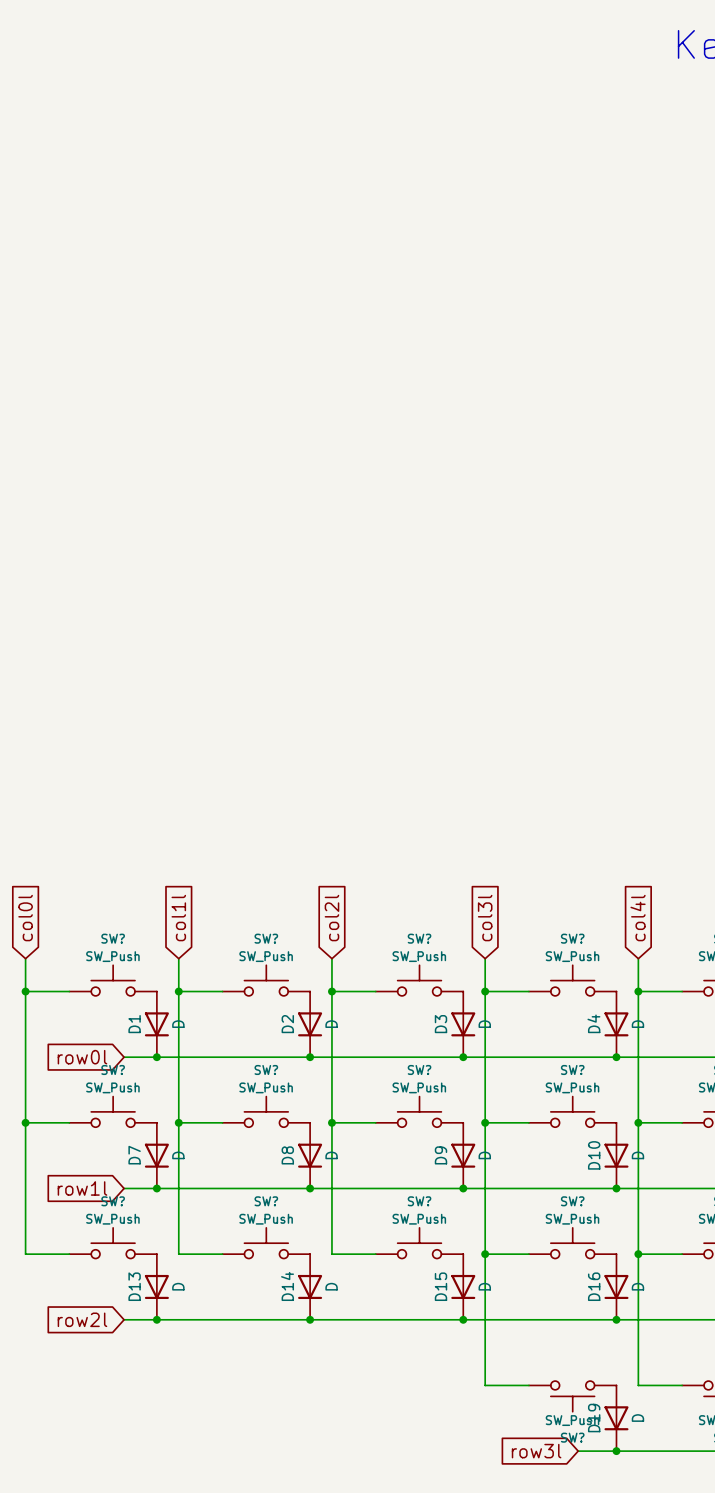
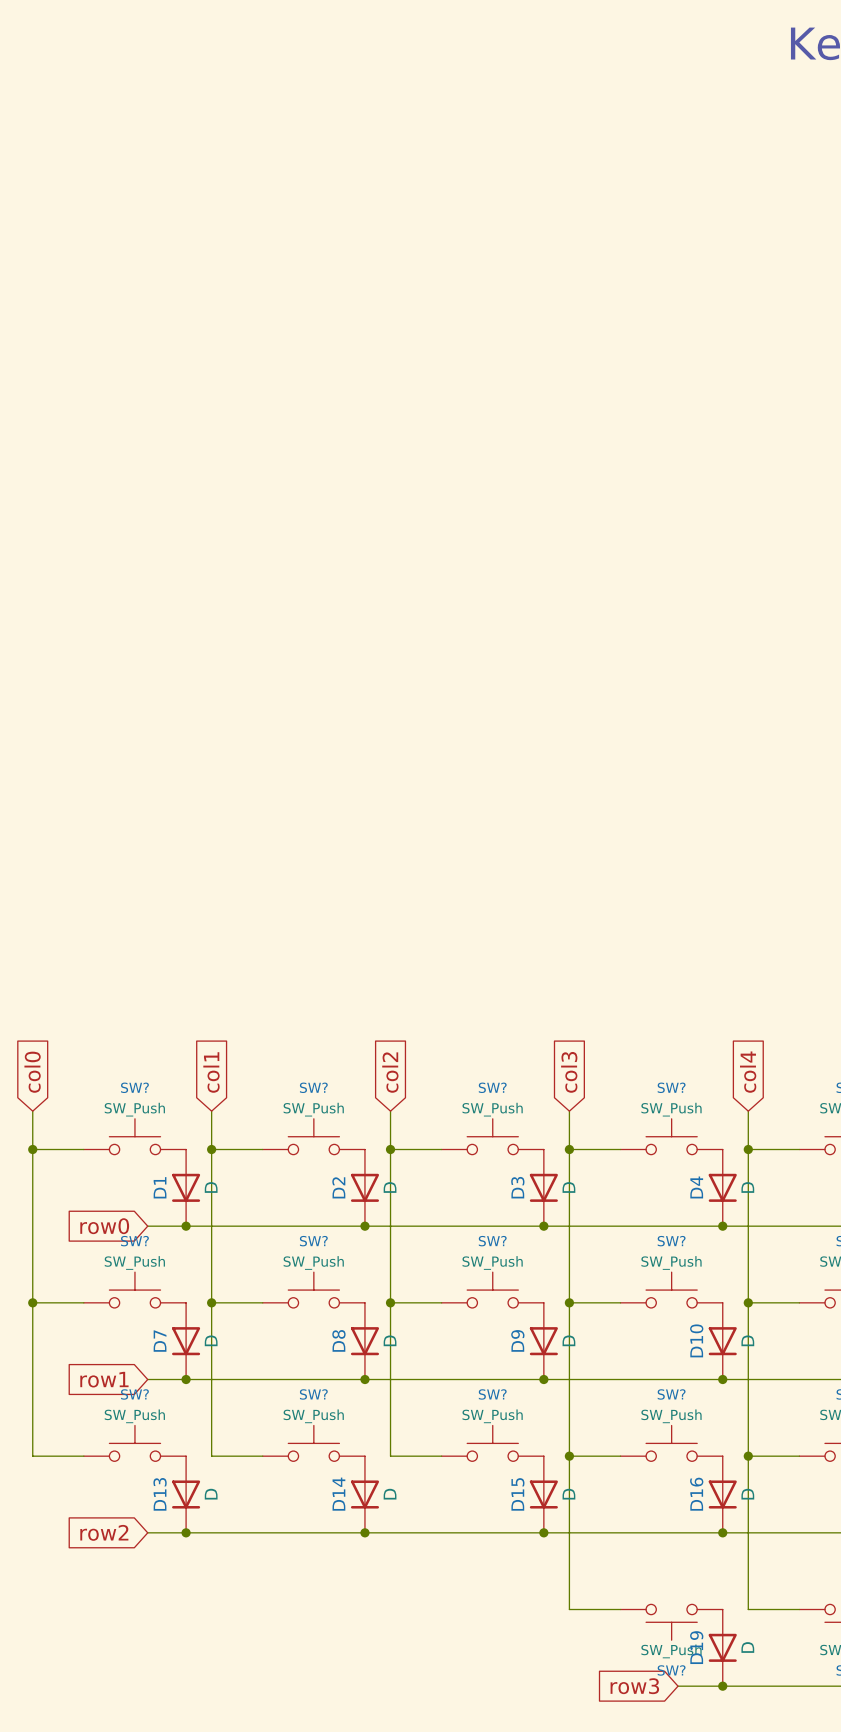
global label: col0l (25, 918) -> col0 (32, 1072)
global label: col1l (178, 918) -> col1 (211, 1072)
global label: col2l (331, 918) -> col2 (390, 1072)
global label: col3l (485, 918) -> col3 (569, 1072)
global label: col4l (638, 918) -> col4 (748, 1072)
global label: row0l (82, 1057) -> row0 (104, 1226)
global label: row1l (82, 1188) -> row1 (104, 1379)
global label: row2l (82, 1319) -> row2 (104, 1532)
global label: row3l (536, 1451) -> row3 (634, 1686)

